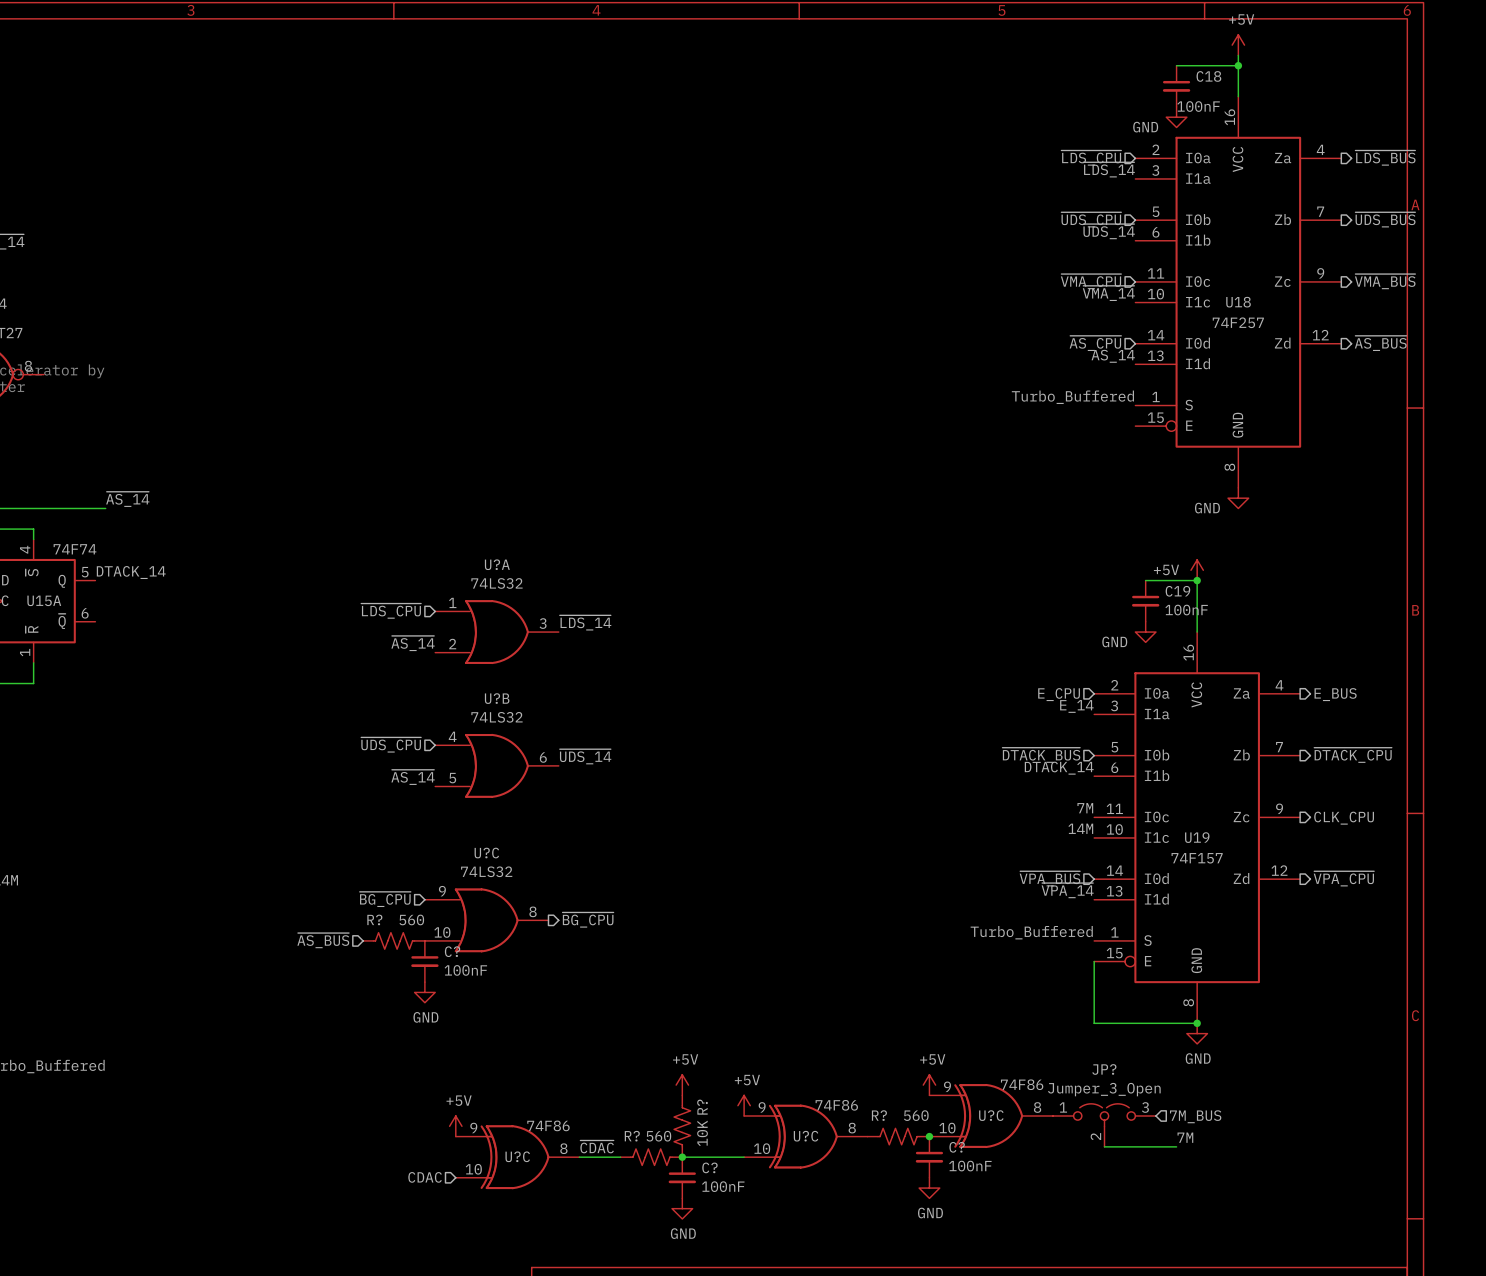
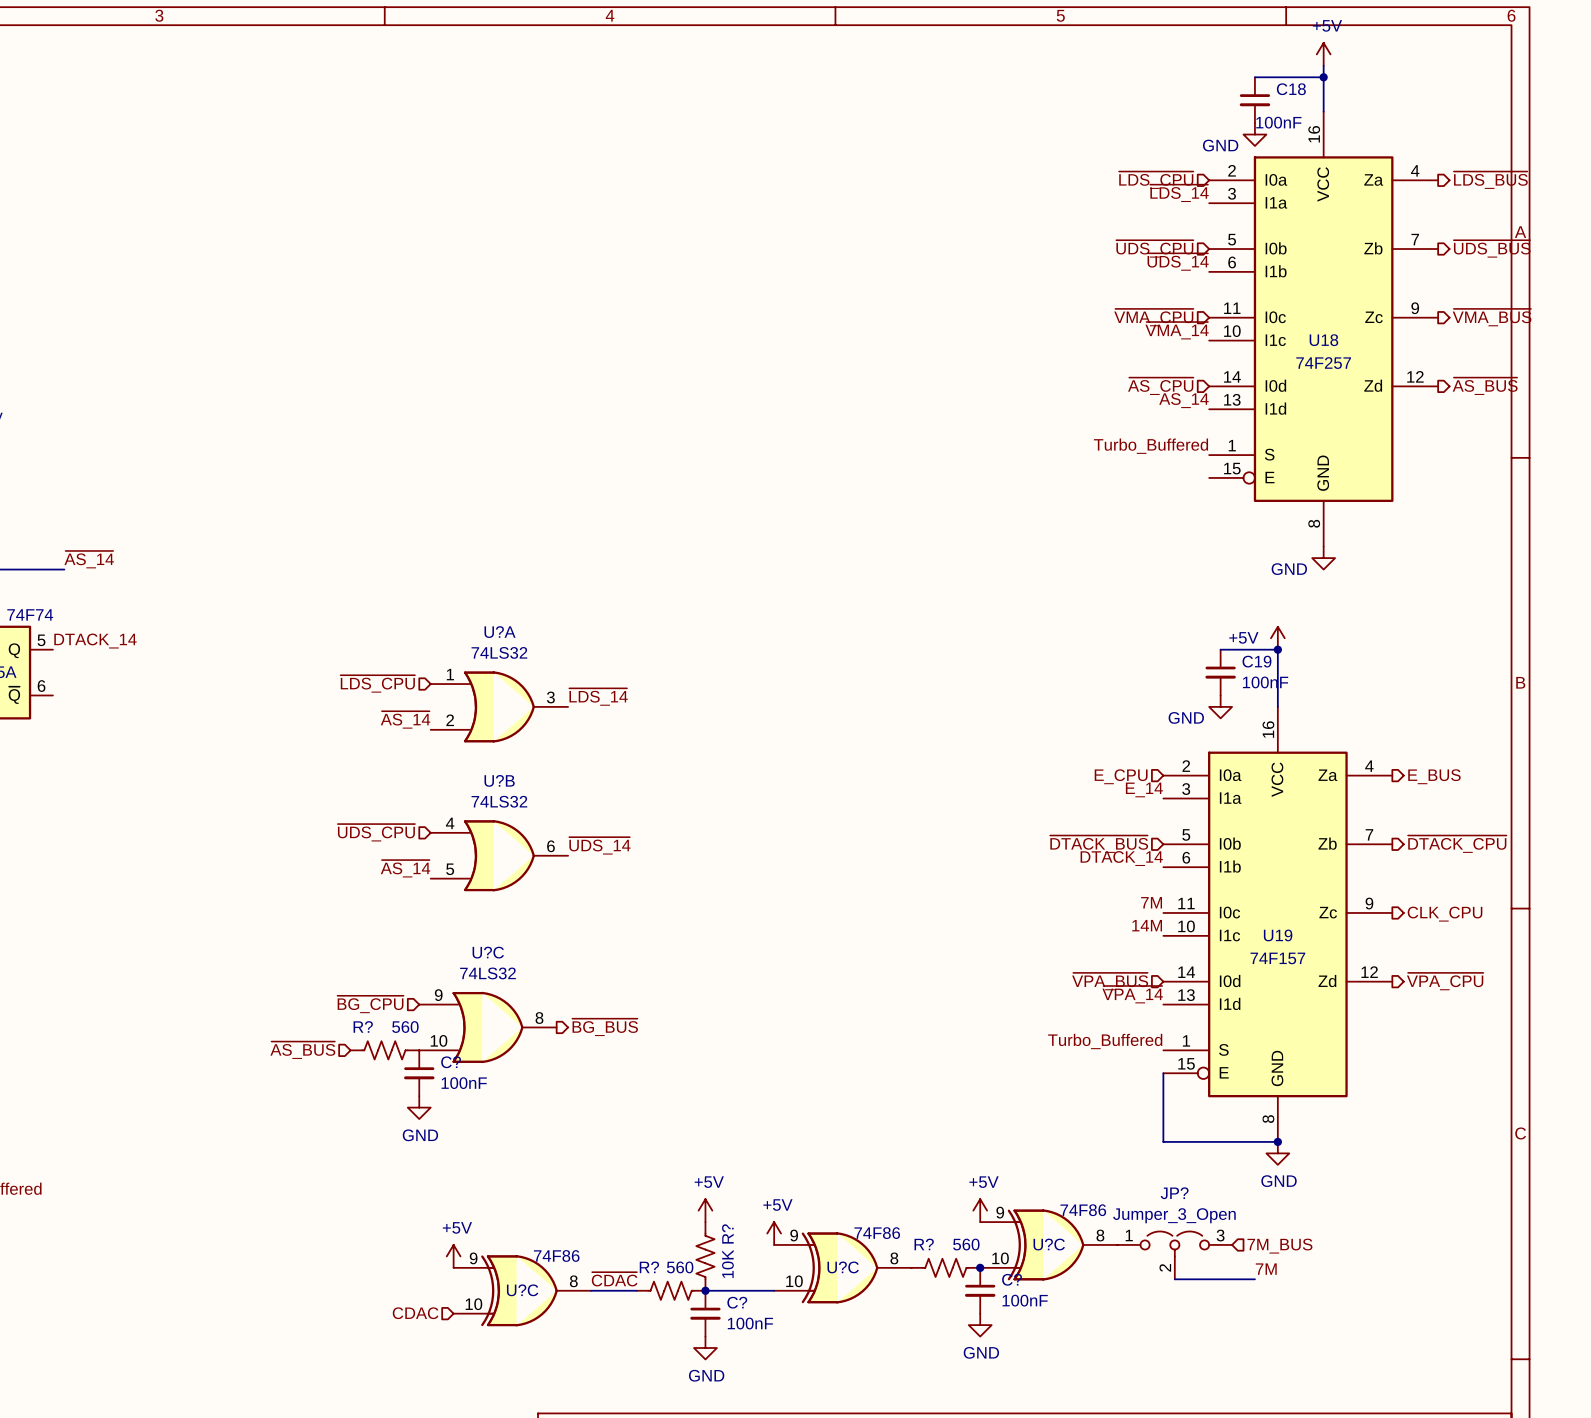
hierarchical label: ~{BG_CPU} (588, 920) -> ~{BG_BUS} (605, 1027)

